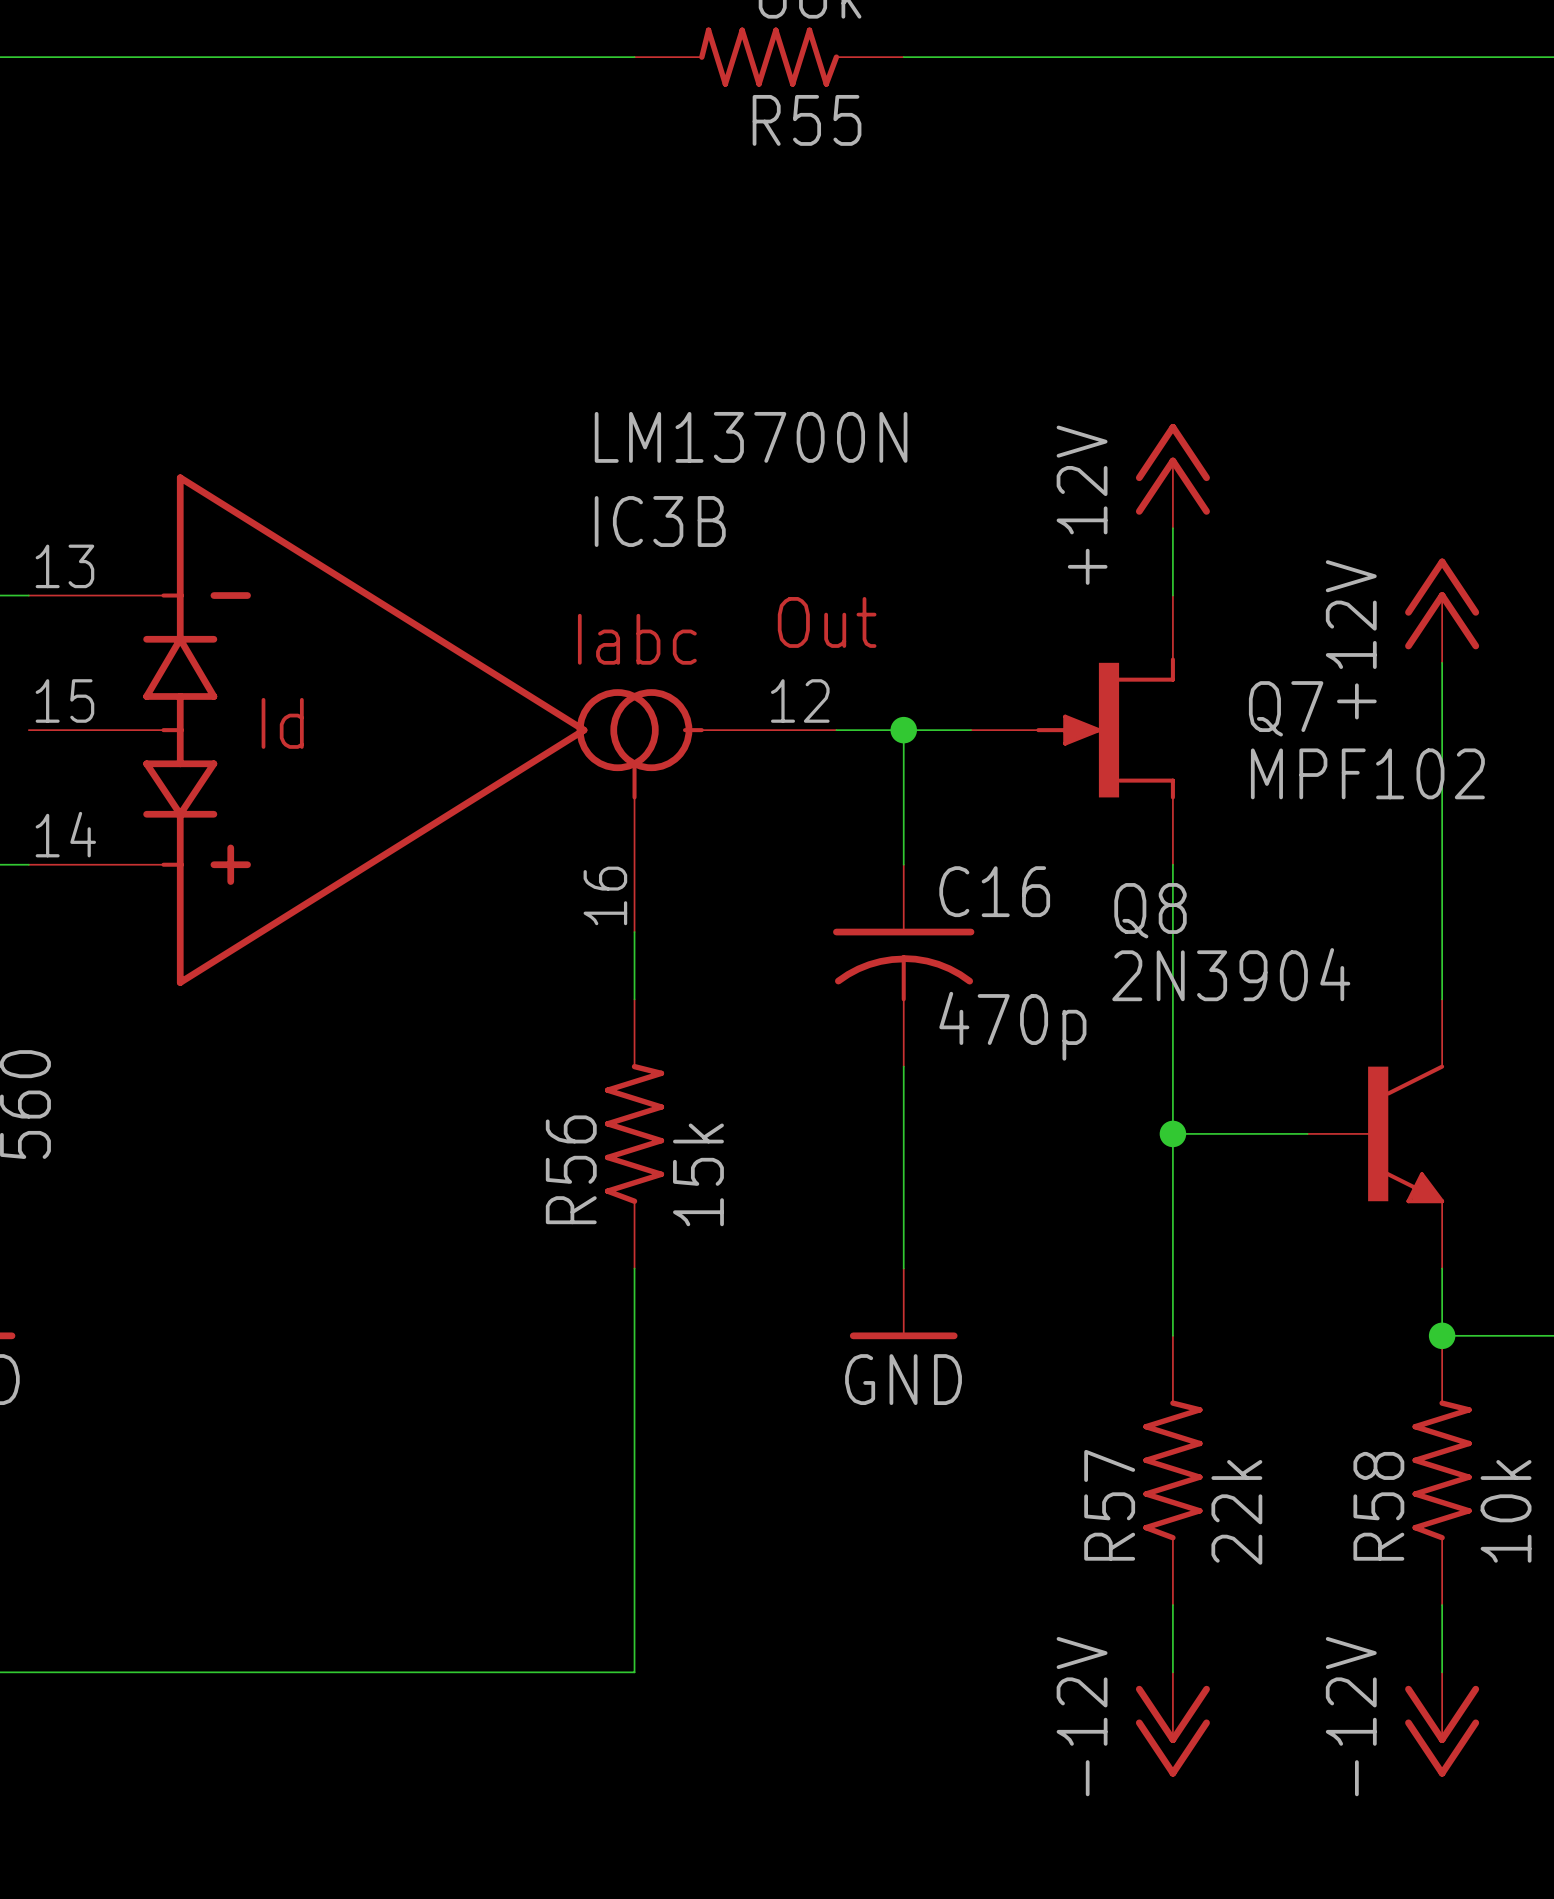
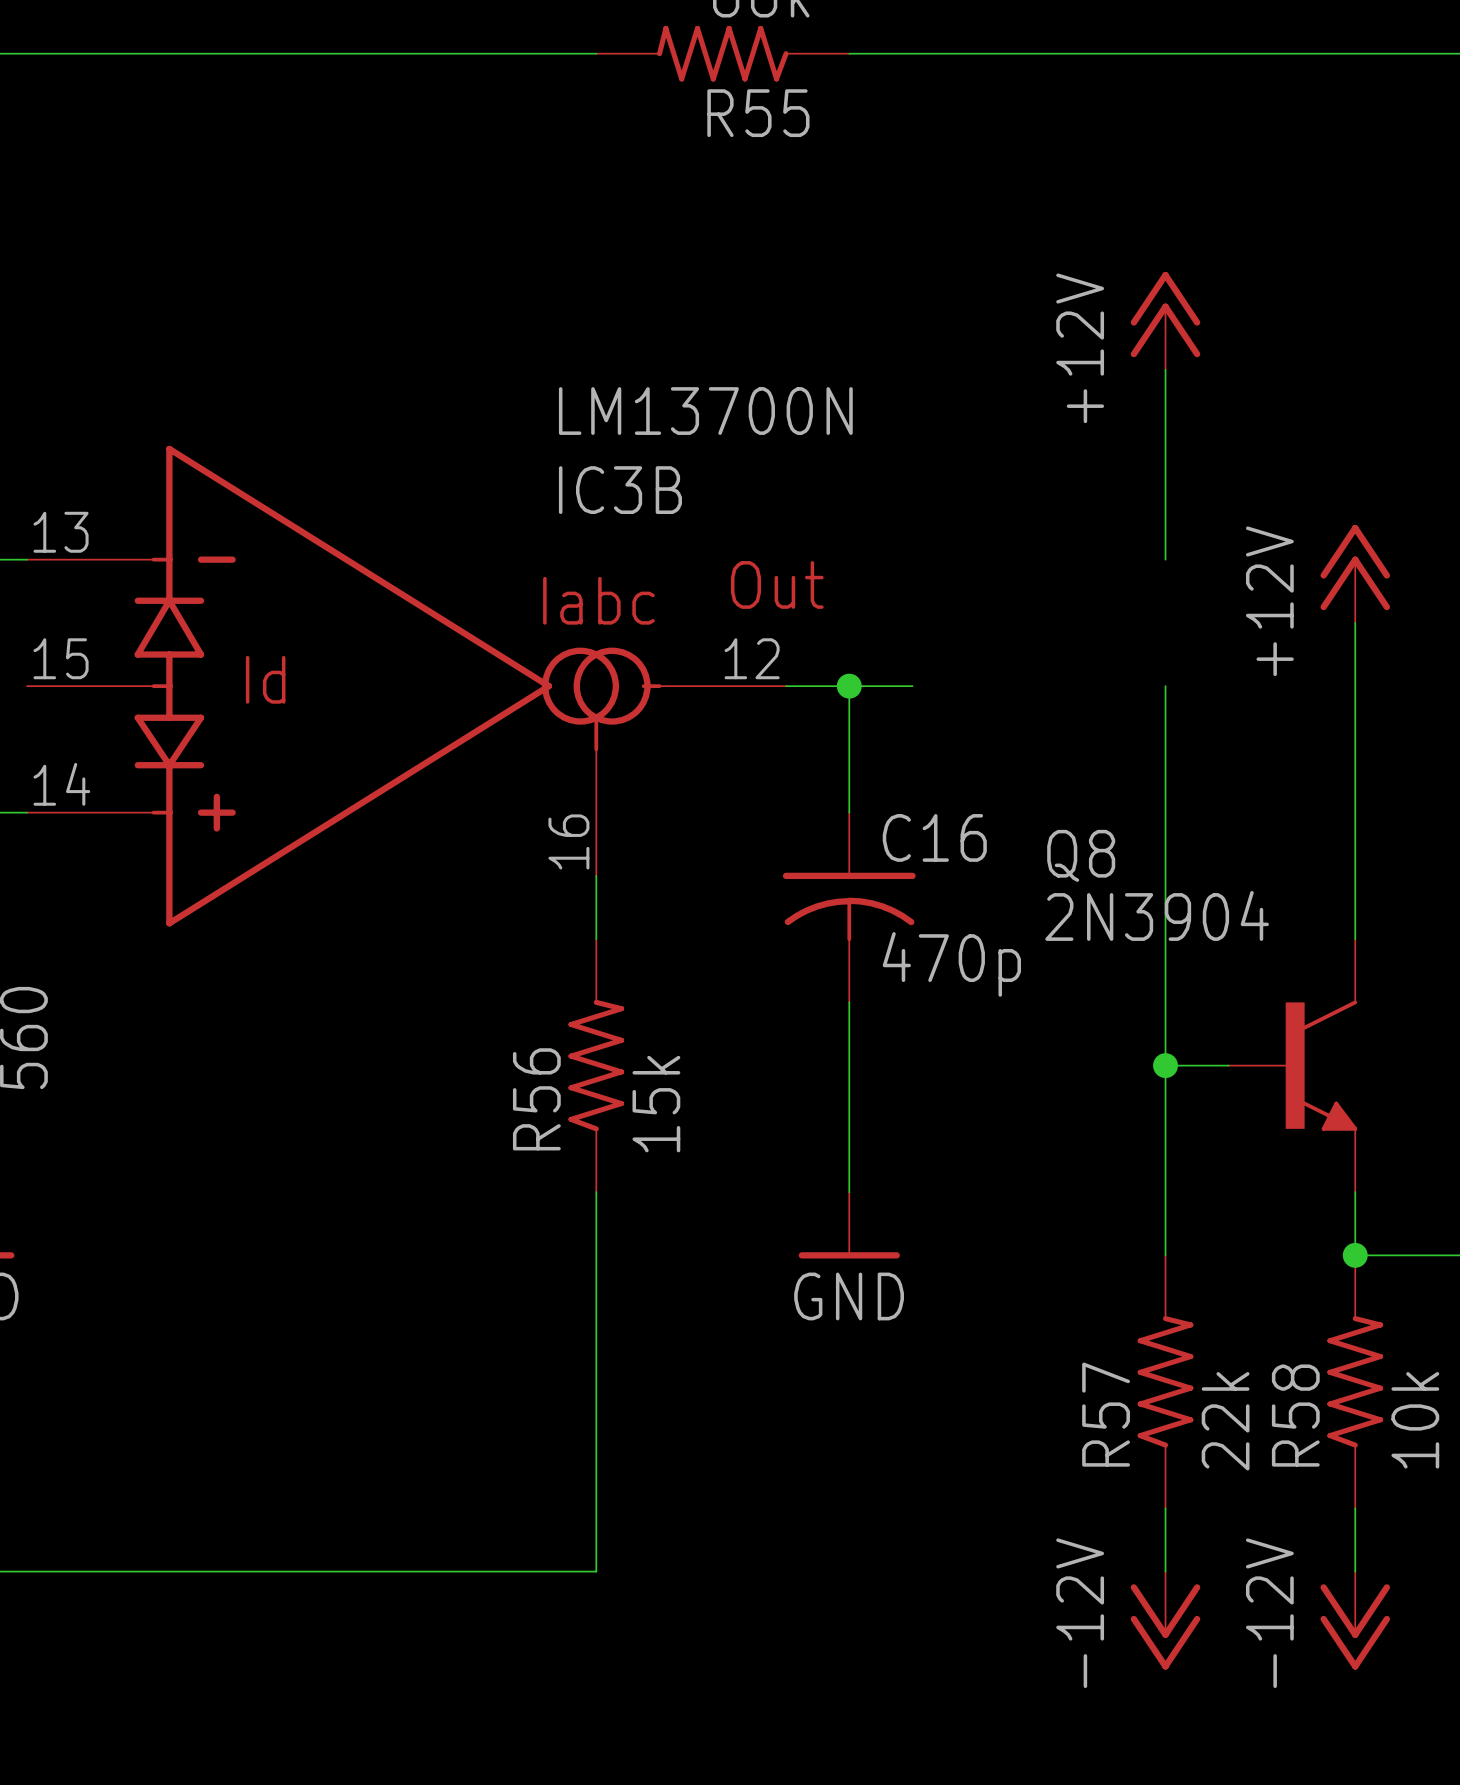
wire: none -> (1165, 369) (1165, 559)
power symbol position: +12V (1172, 476) -> +12V (1165, 320)
wire: (1172, 528) (1172, 595) -> none
Q7: MPF102 (1072, 730) -> none
wire: none -> (1165, 686) (1165, 1255)
wire: (1172, 864) (1172, 1335) -> none
wire: (1172, 1133) (1240, 1133) -> none
junction position: (1172, 1133) -> (1165, 1065)
R57 position: (1172, 1470) -> (1165, 1381)
wire: (1172, 1605) (1172, 1672) -> (1165, 1508) (1165, 1571)
power symbol position: -12V (1172, 1724) -> -12V (1165, 1620)

